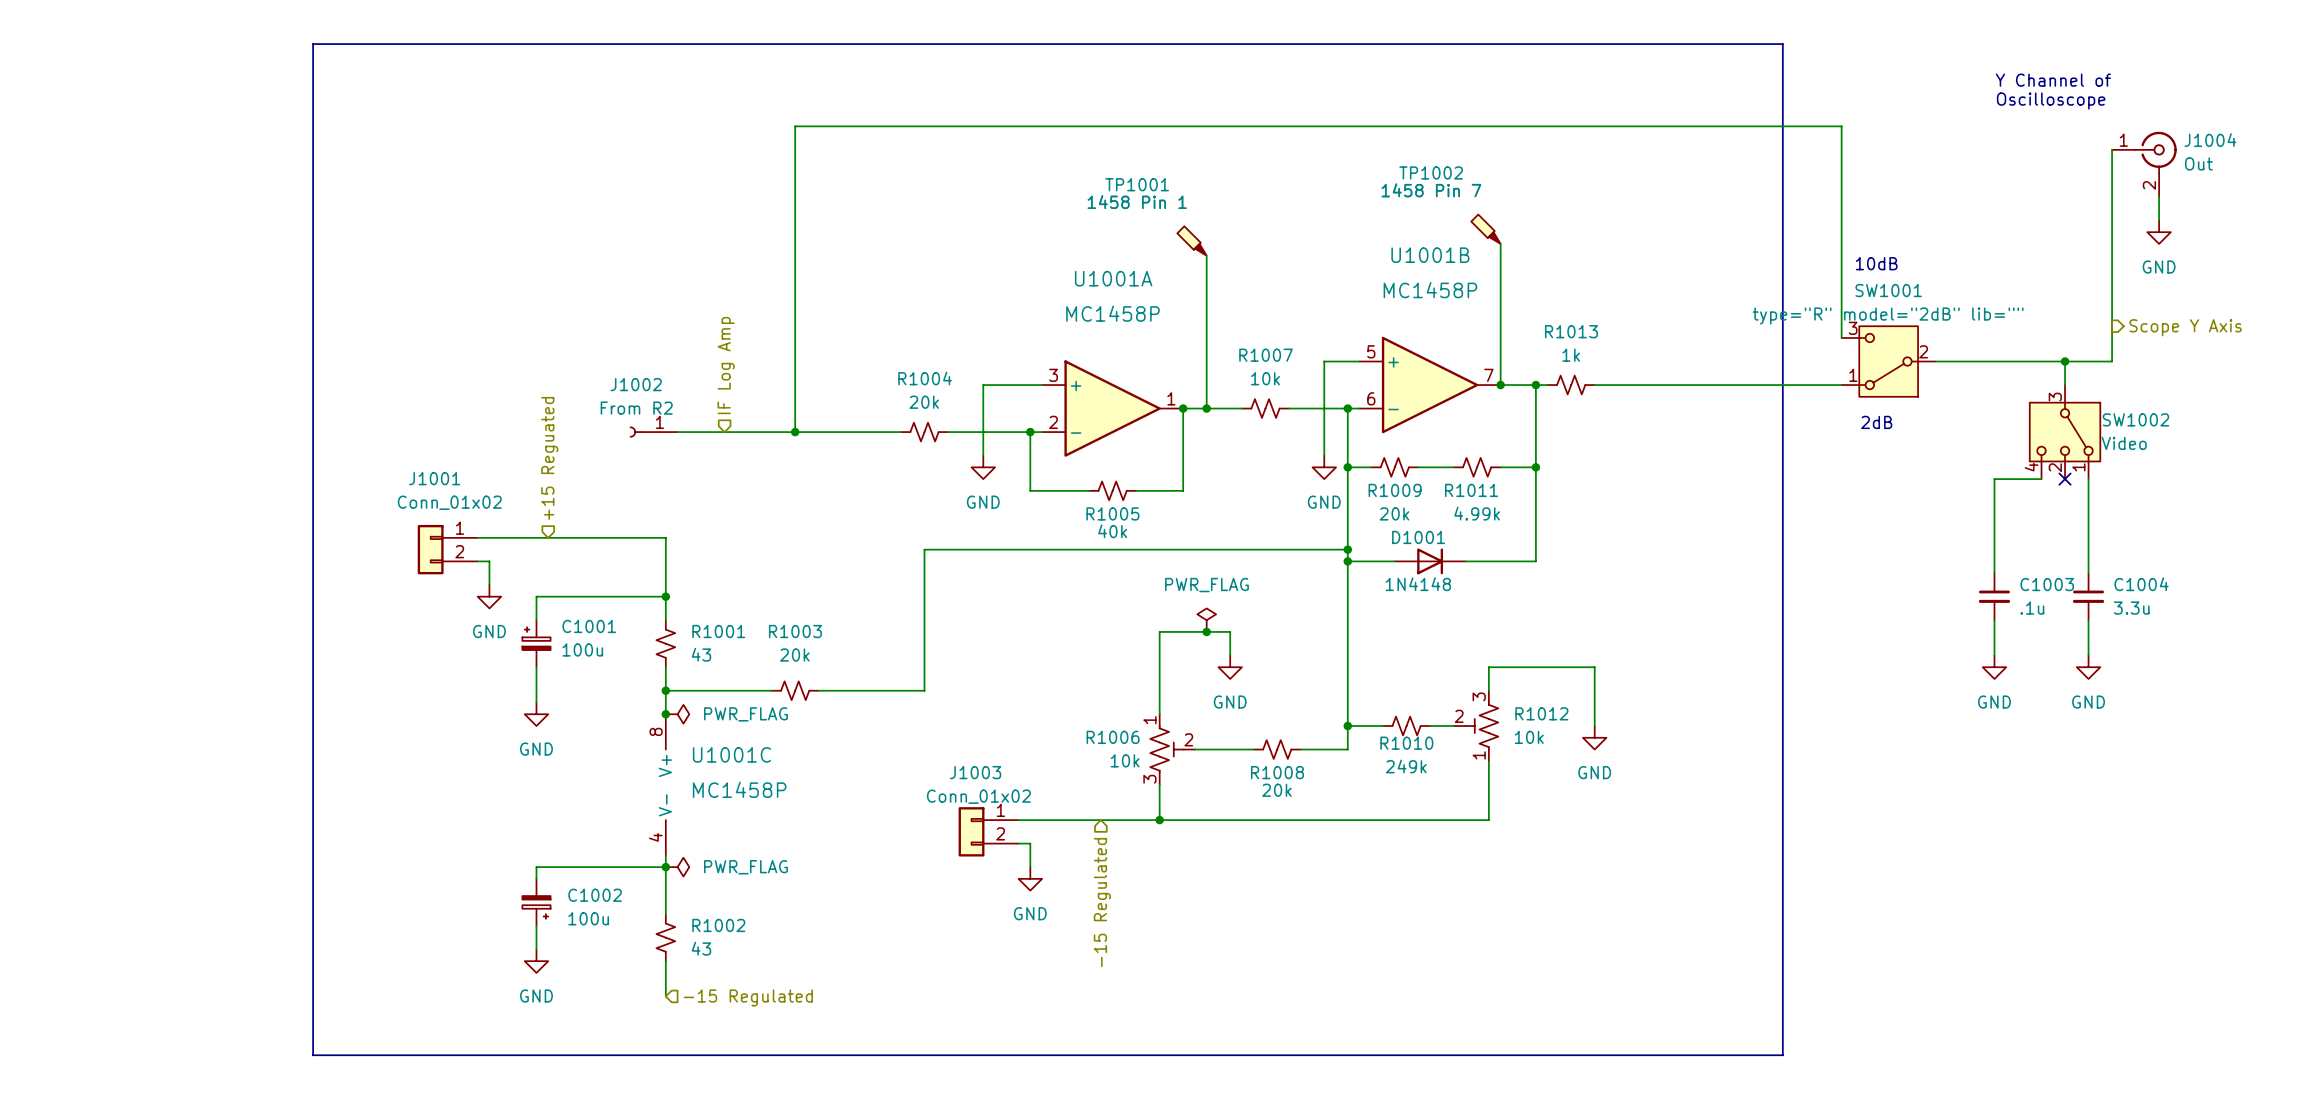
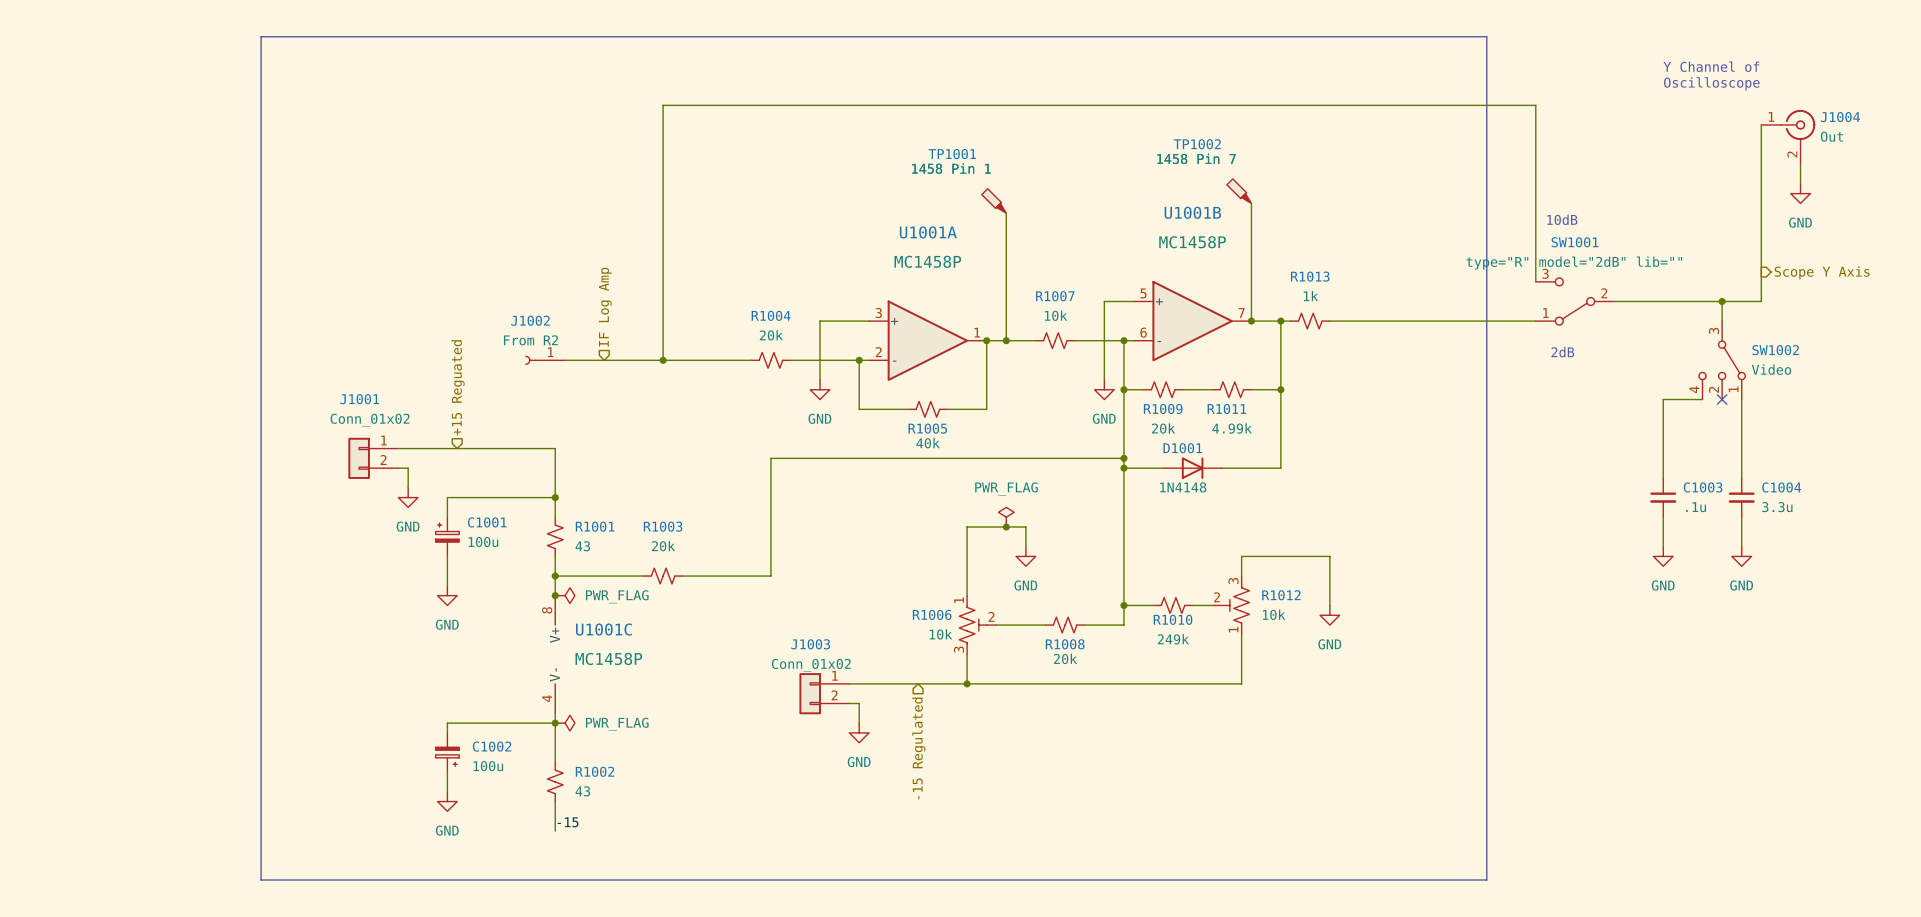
SW1001 symbol: [1841, 326, 1936, 397] -> [1535, 277, 1615, 326]
SW1002 symbol: [2029, 385, 2101, 480] -> [1698, 321, 1746, 400]
label: none -> -15 (568, 822)
hierarchical label: -15 Regulated (748, 997) -> none

